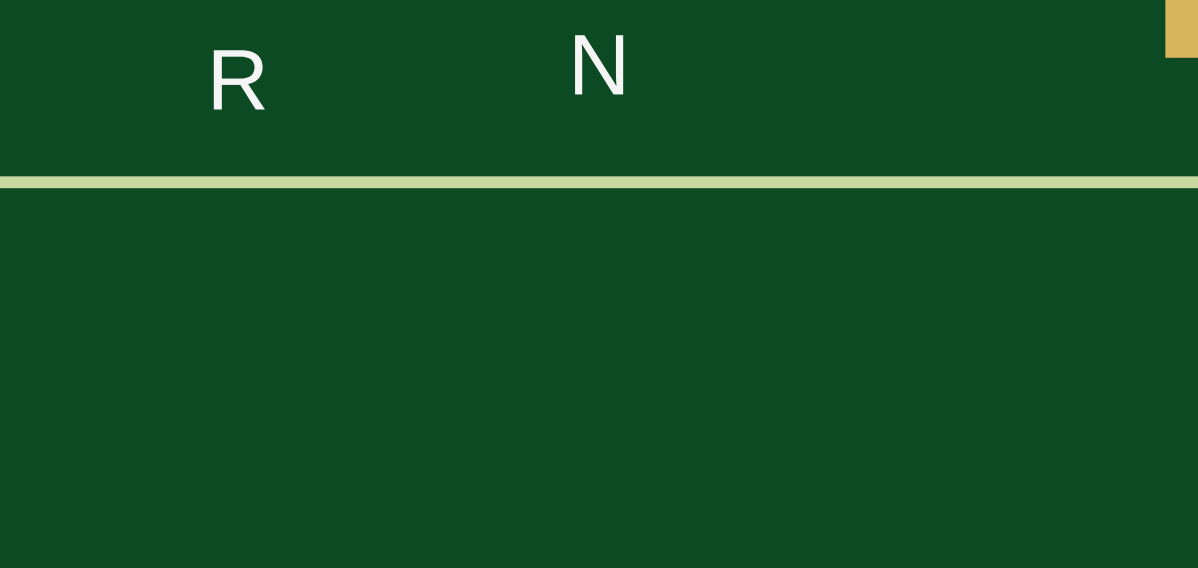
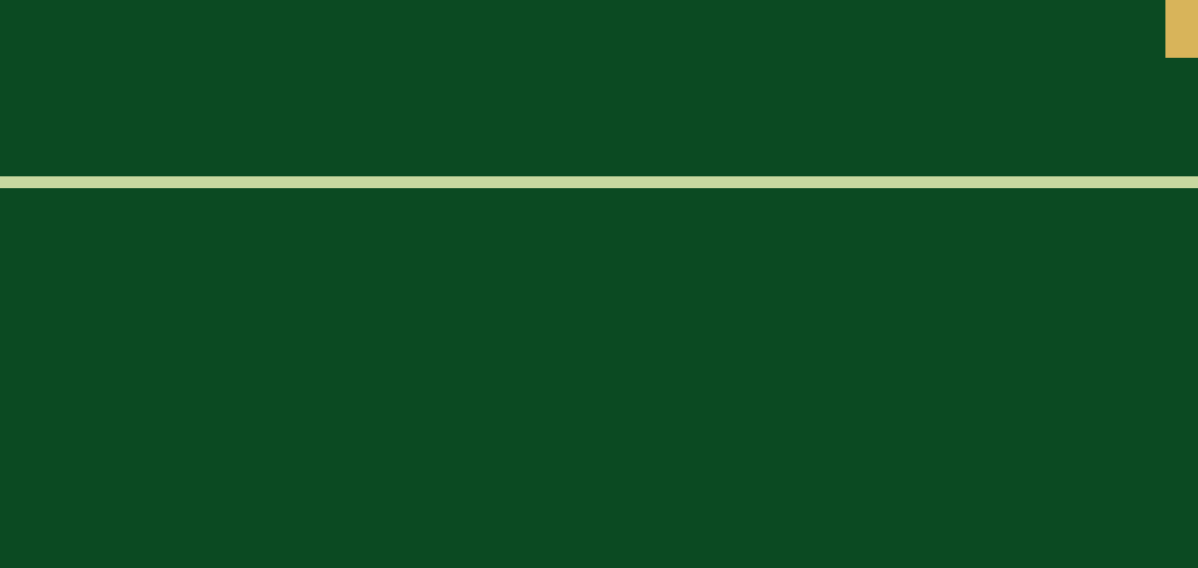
text: N (599, 64) -> none
text: R (239, 79) -> none

